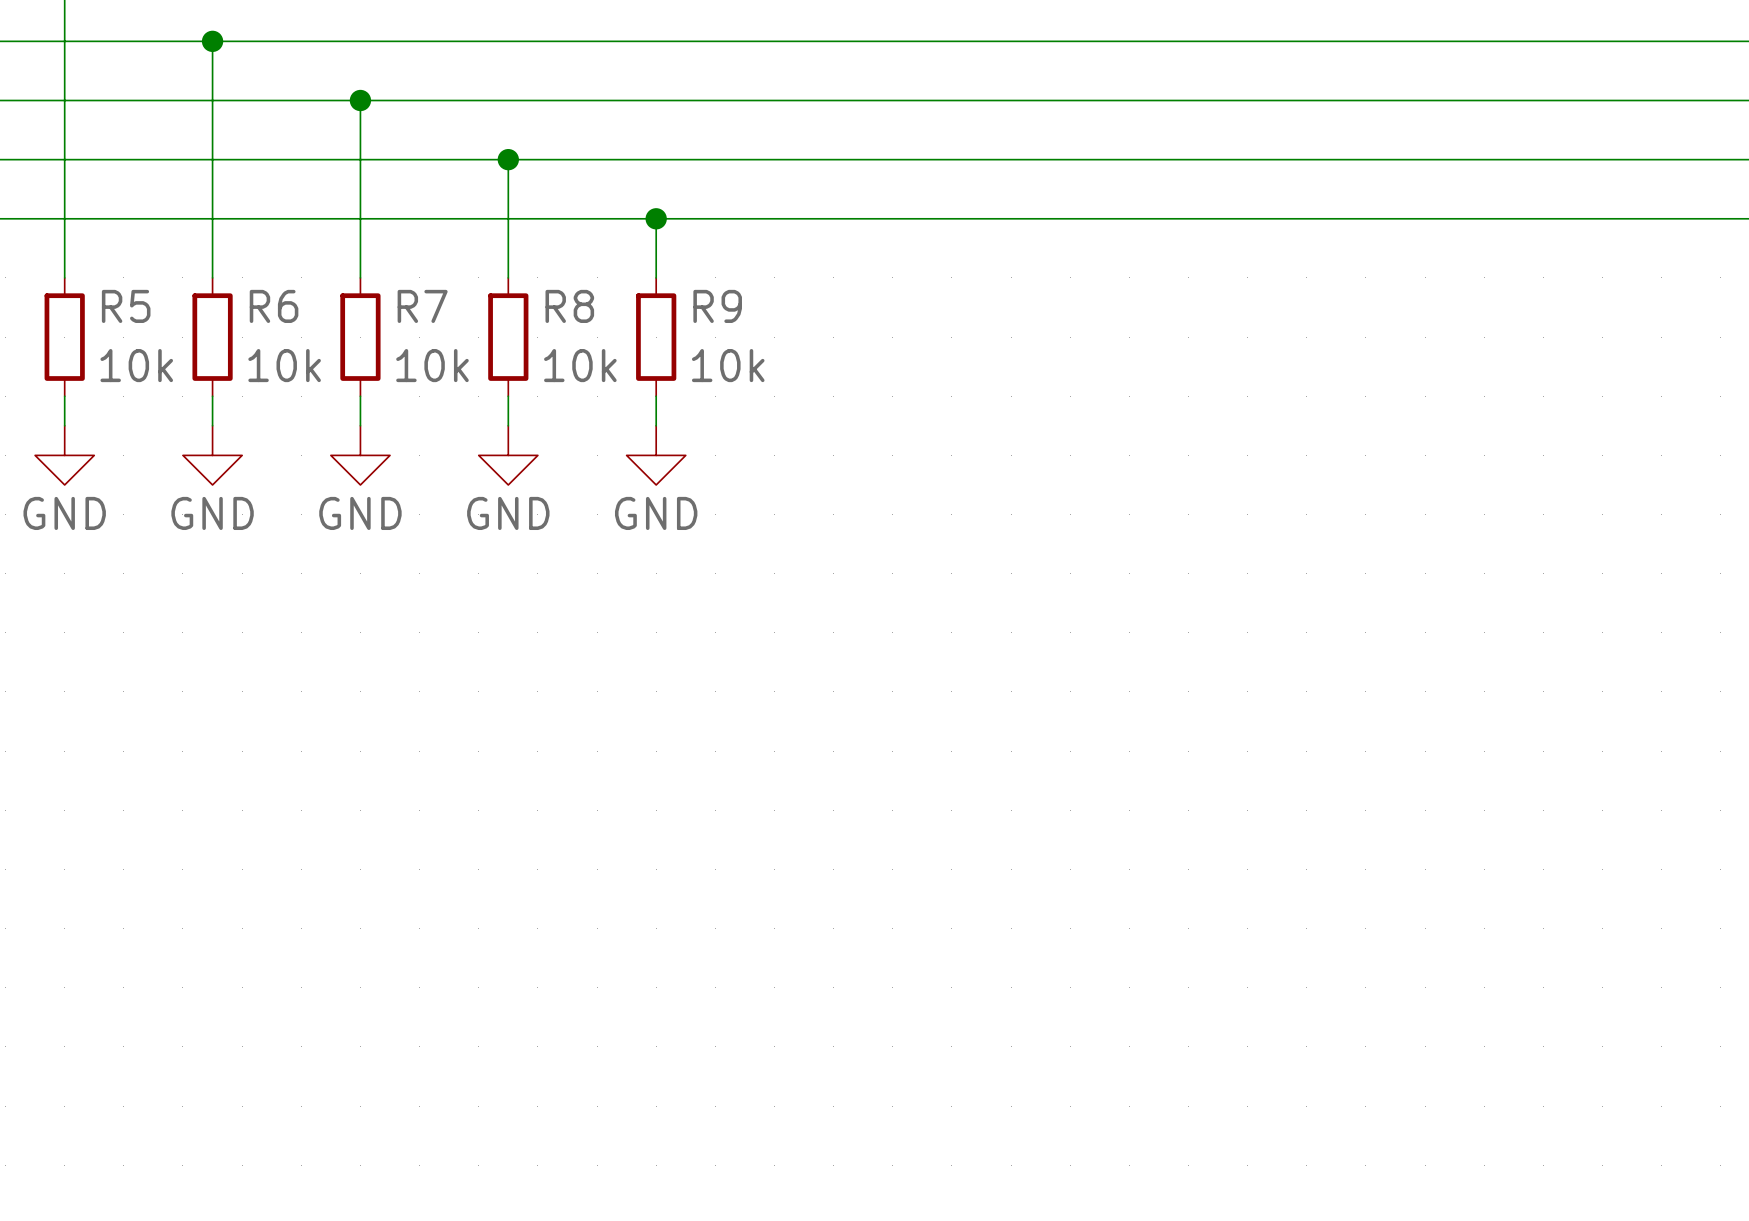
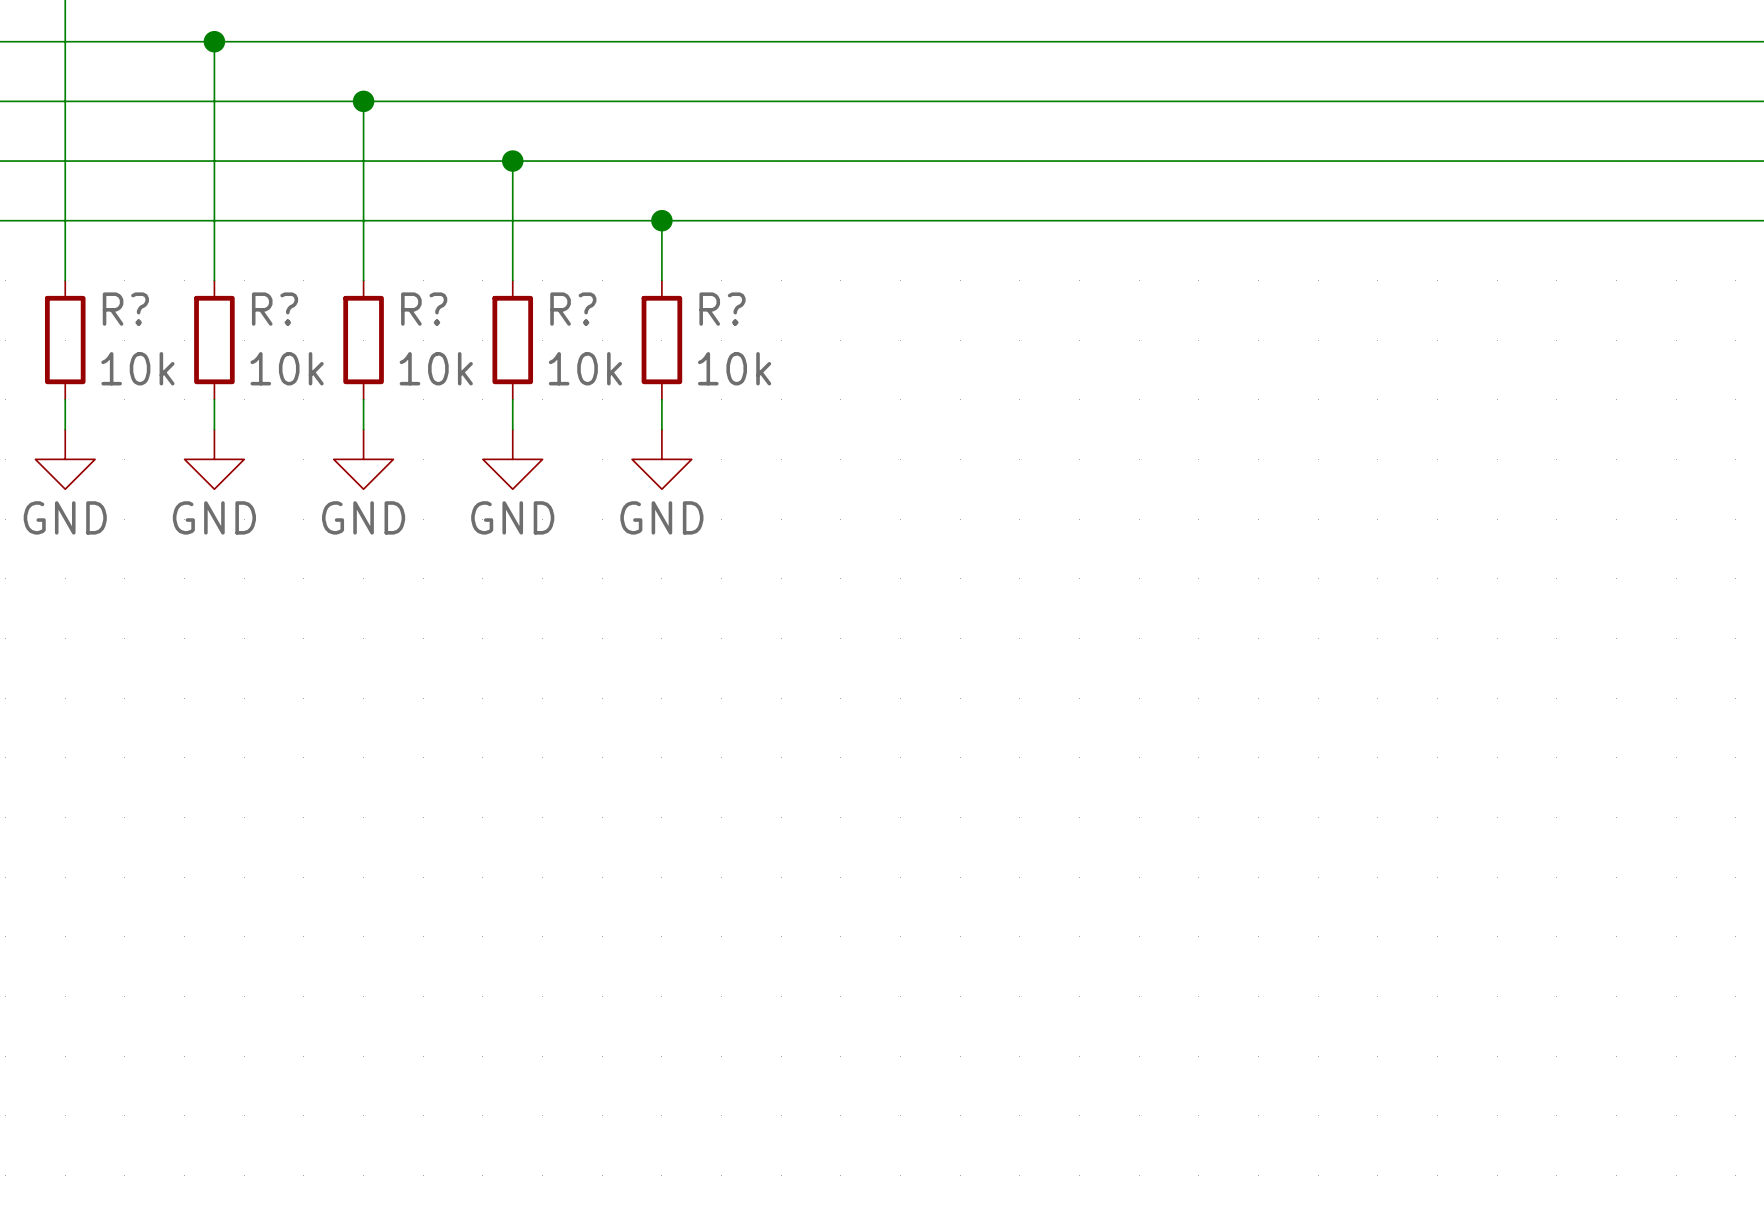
R5 name: R5 (126, 306) -> R? (125, 309)
R6 name: R6 (274, 306) -> R? (275, 309)
R7 name: R7 (422, 306) -> R? (424, 309)
R8 name: R8 (569, 306) -> R? (573, 309)
R9 name: R9 (717, 306) -> R? (722, 309)

